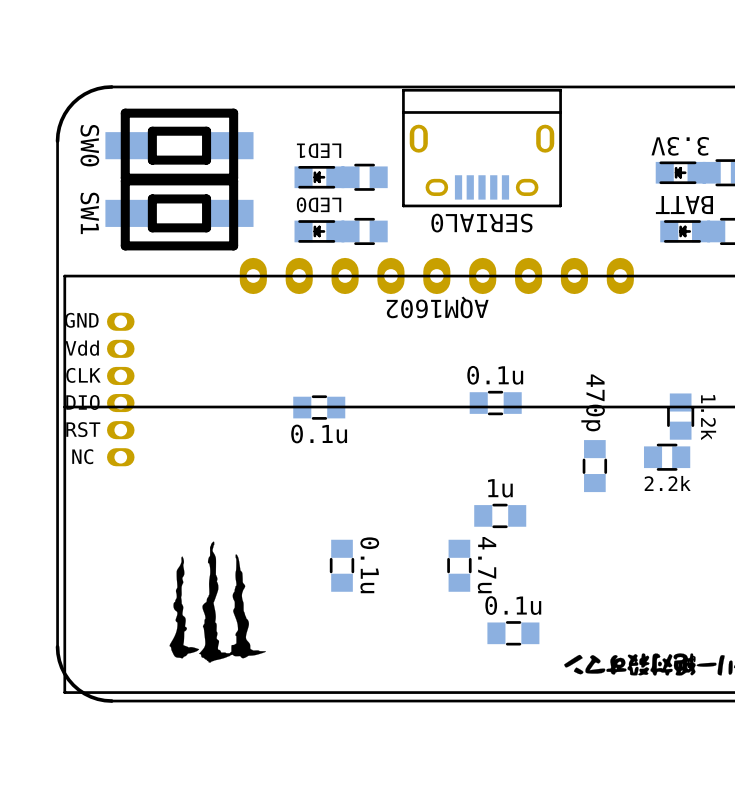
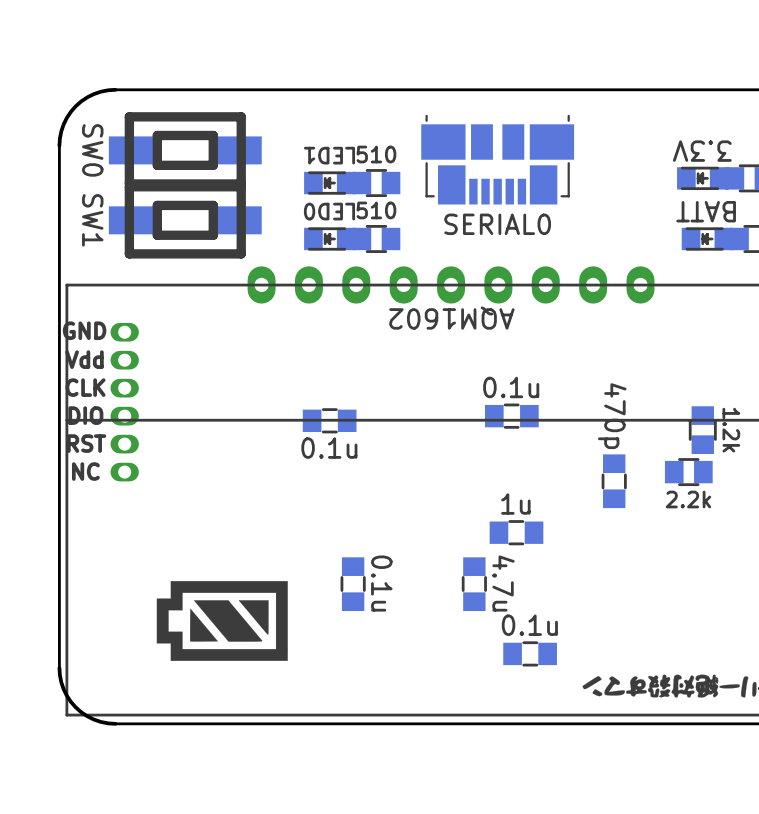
part footprint: [402, 88, 562, 208] -> [421, 114, 575, 205]
part value: none -> 510 (376, 154)
part value: none -> 510 (376, 210)
drawing shape: [169, 541, 266, 663] -> [156, 581, 288, 661]

